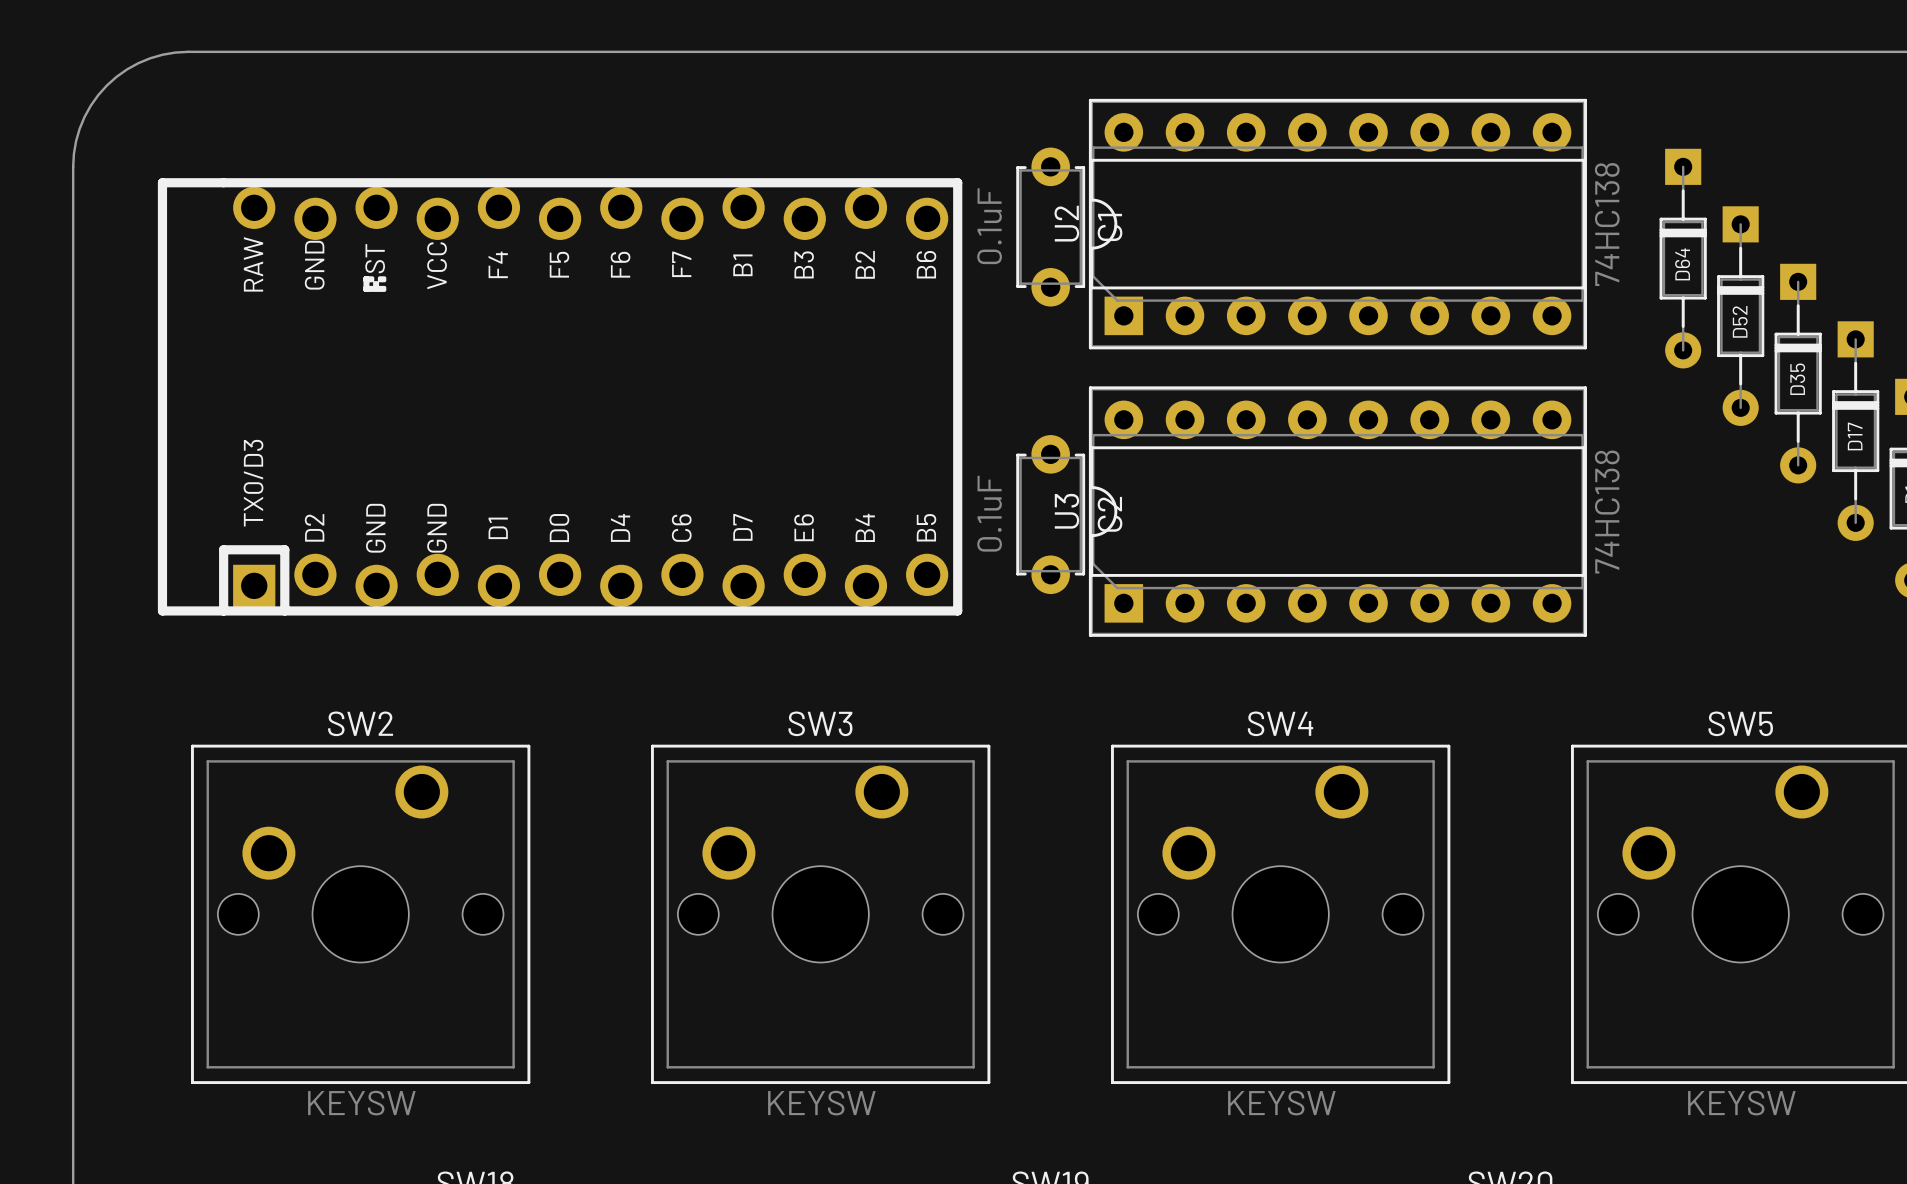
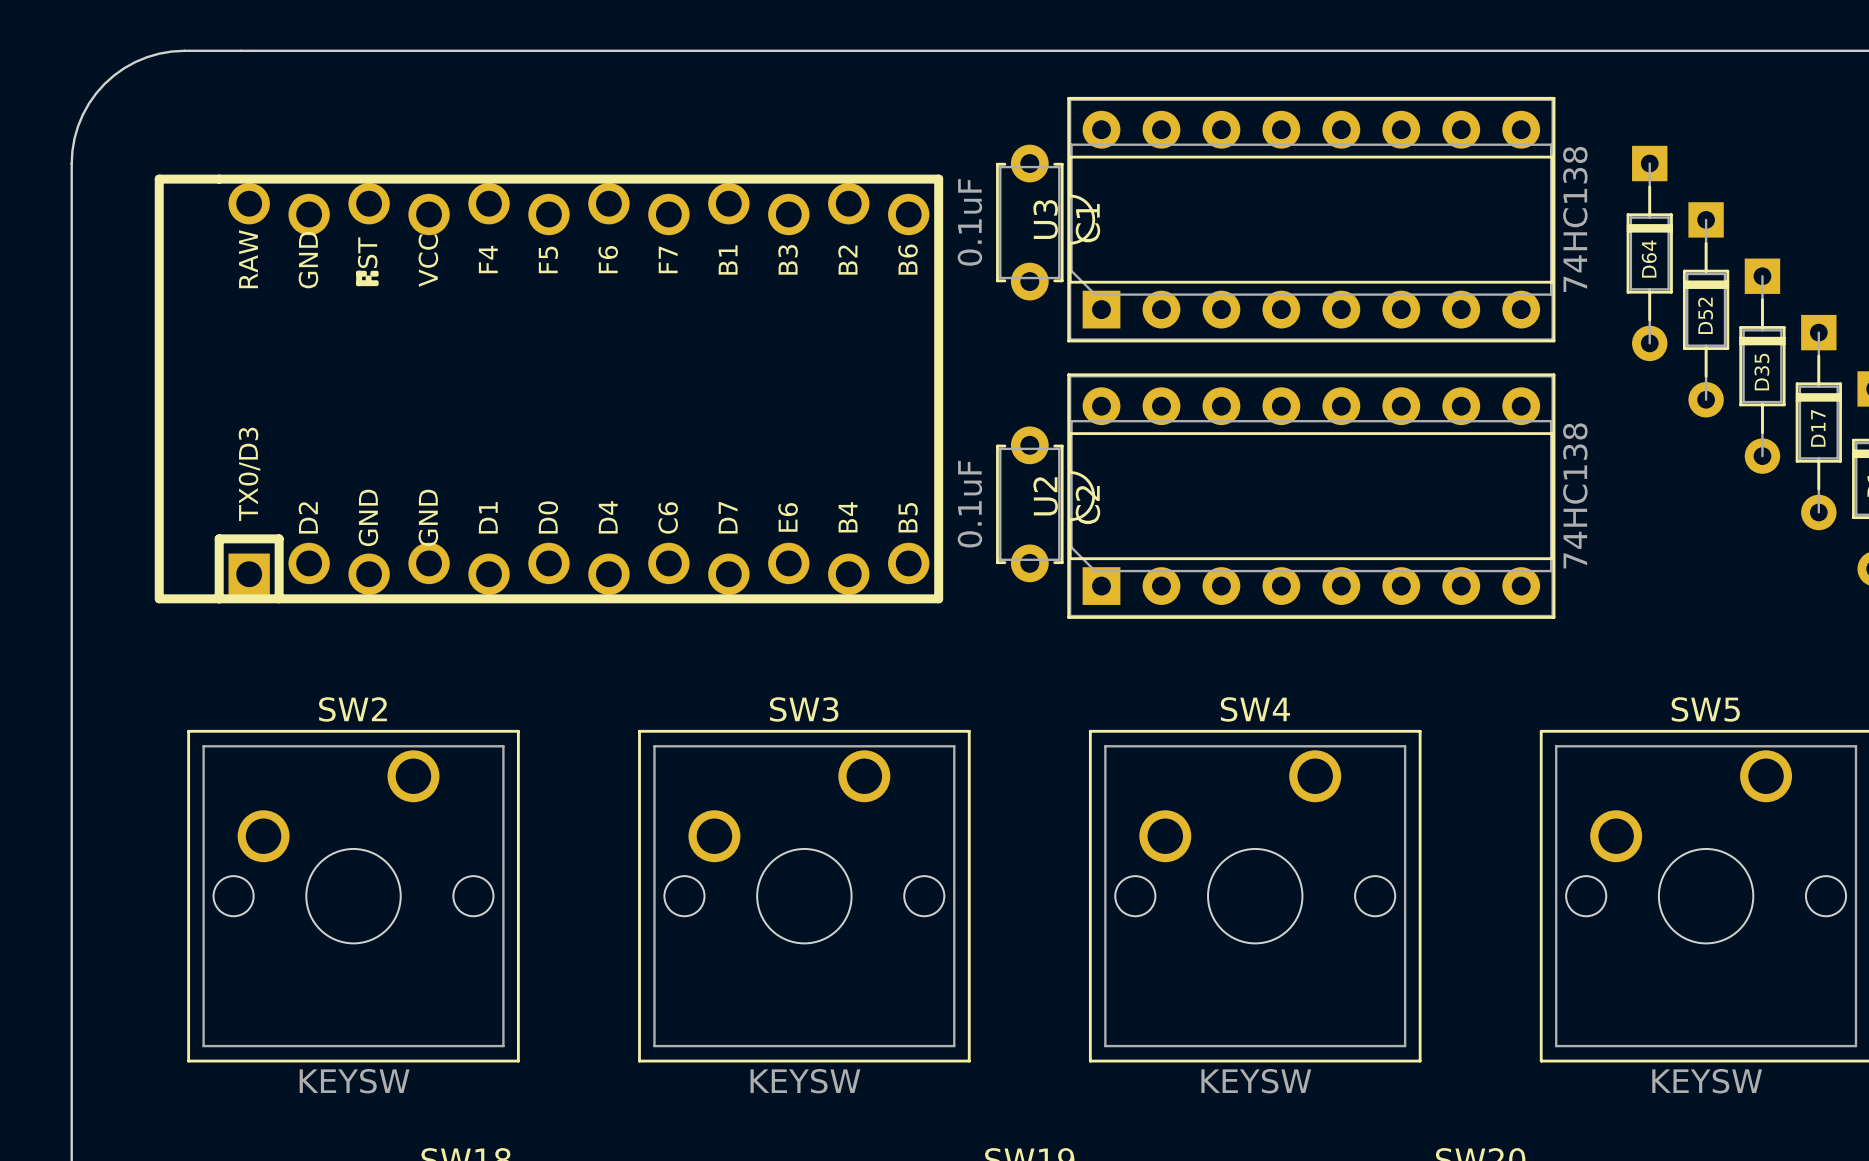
U2 name: U2 (1066, 223) -> U3 (1045, 219)
U2: none -> 74HC138 (1311, 496)
U3: 74HC138 (1337, 511) -> none

